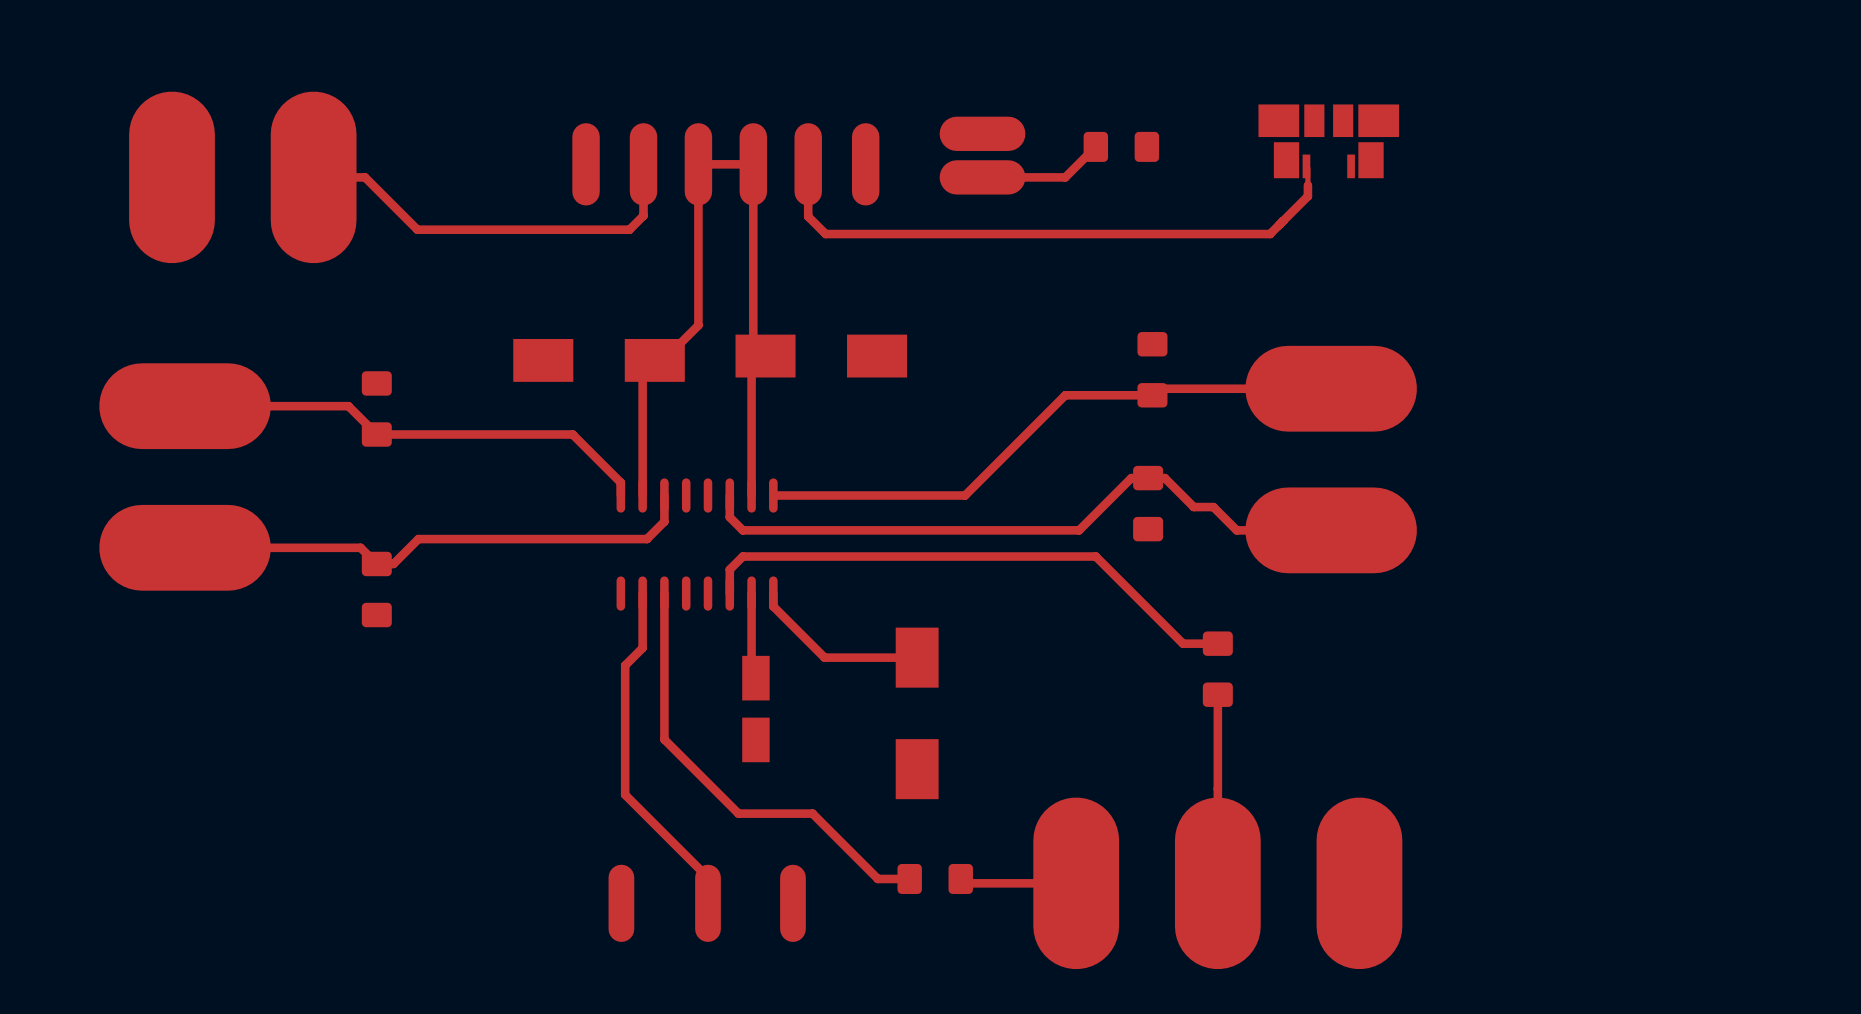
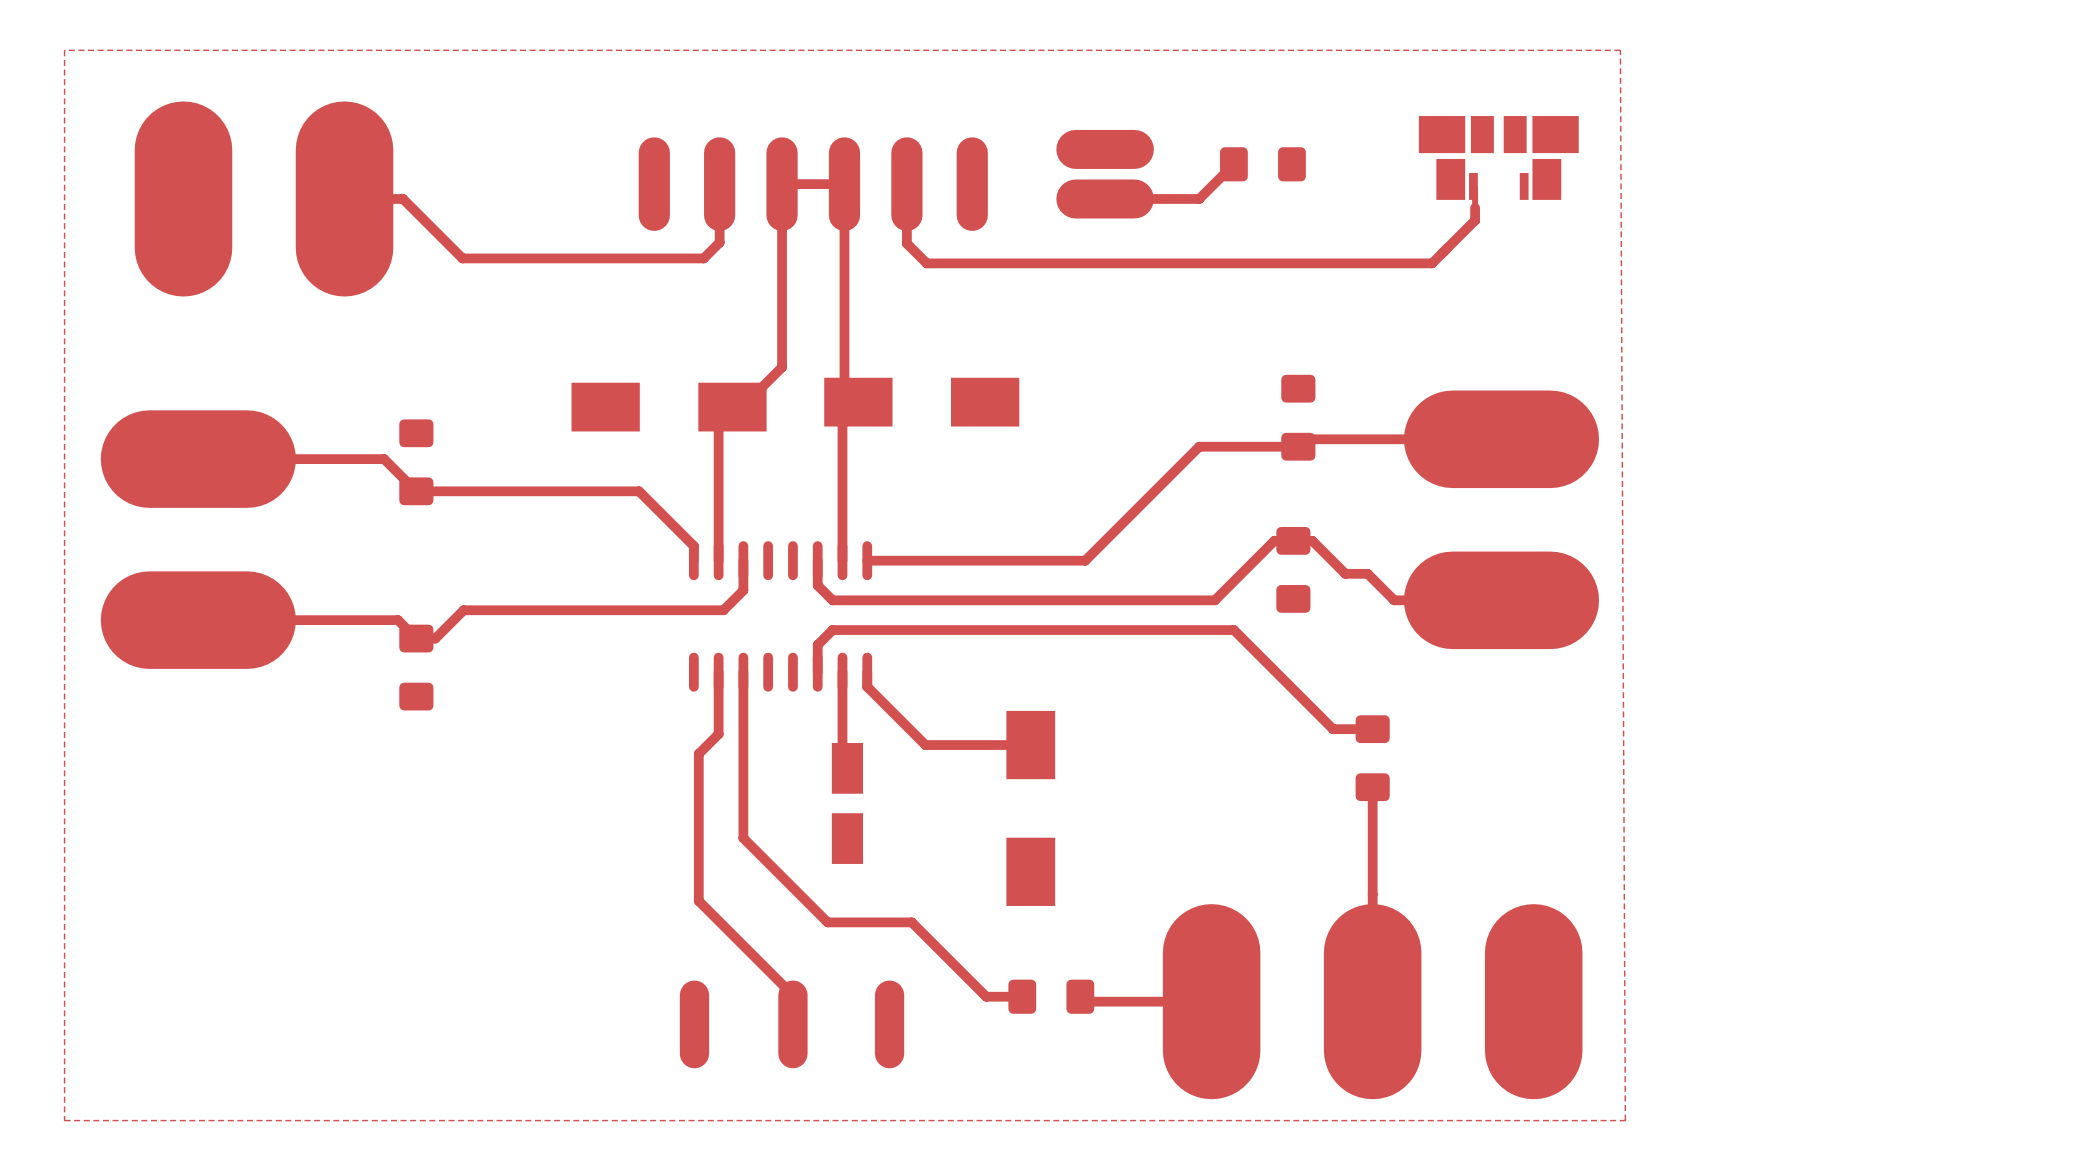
top zone outline: none -> (1620, 50) (64, 50) (64, 1120) (1625, 1120) (1620, 50)

